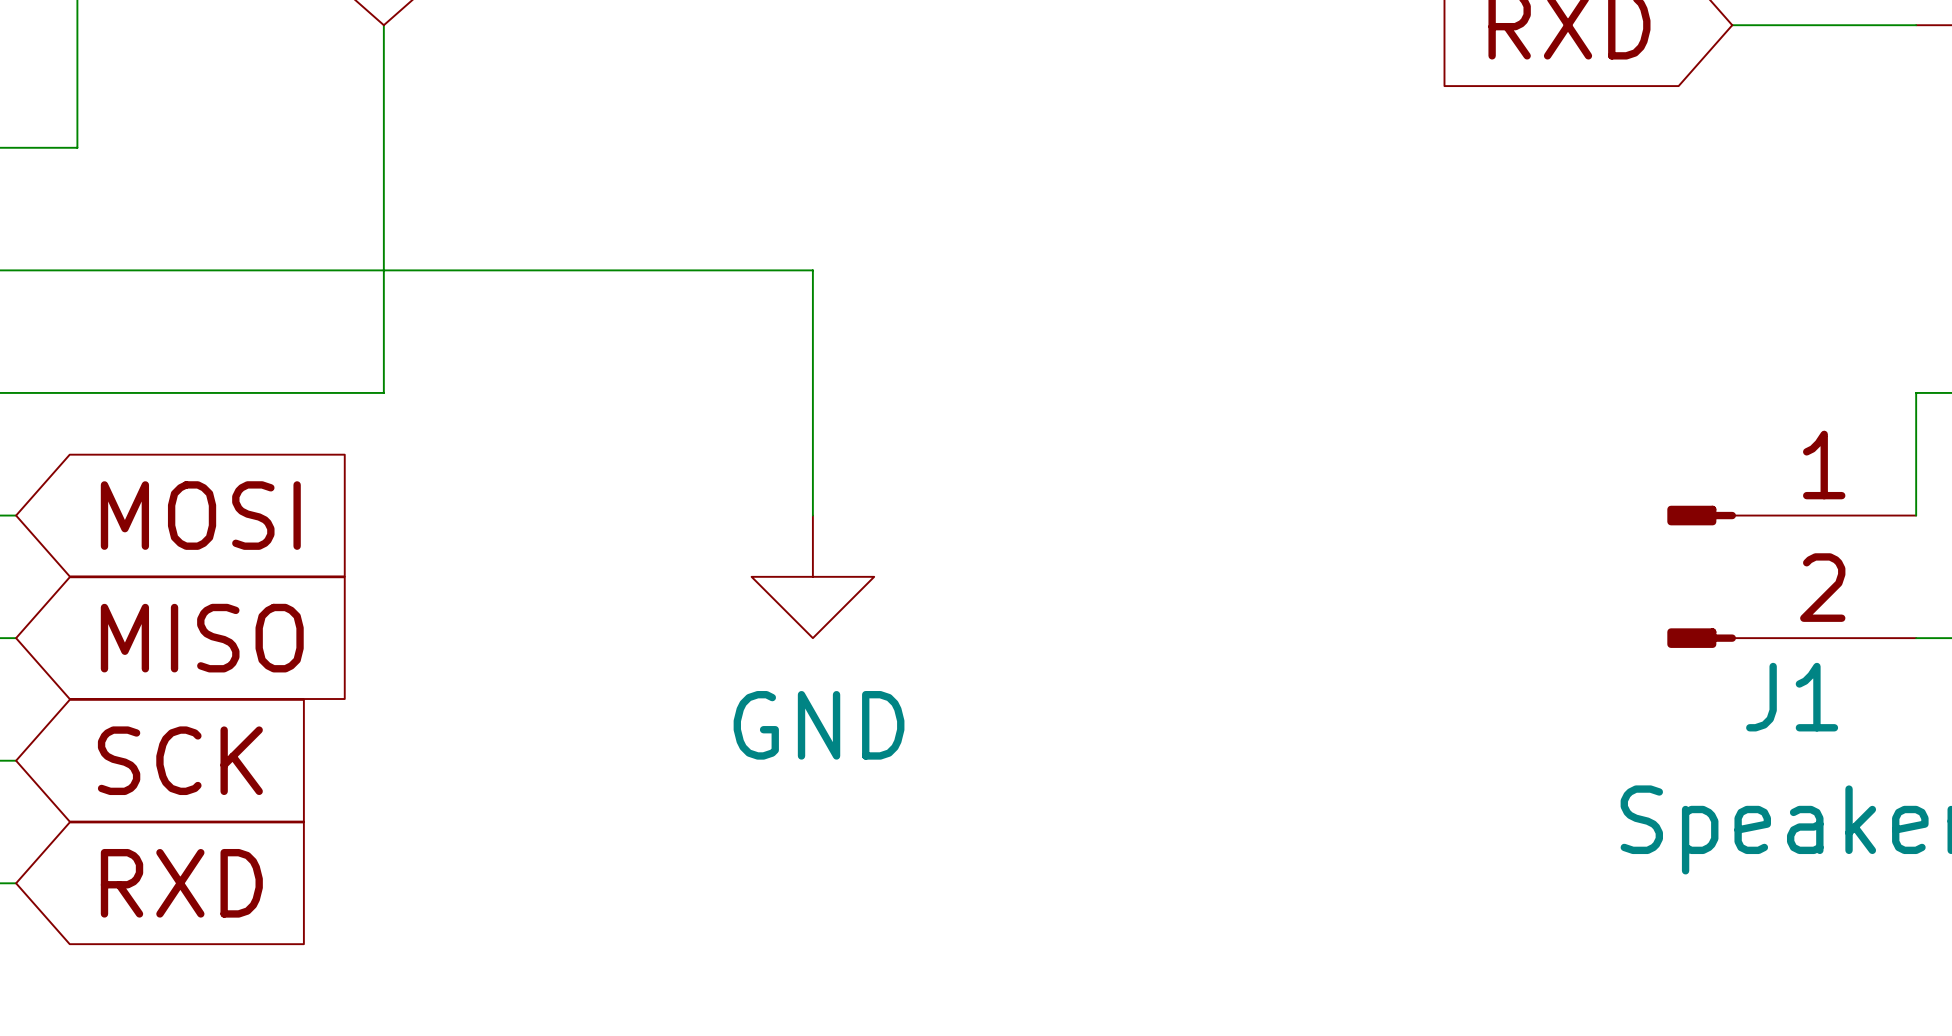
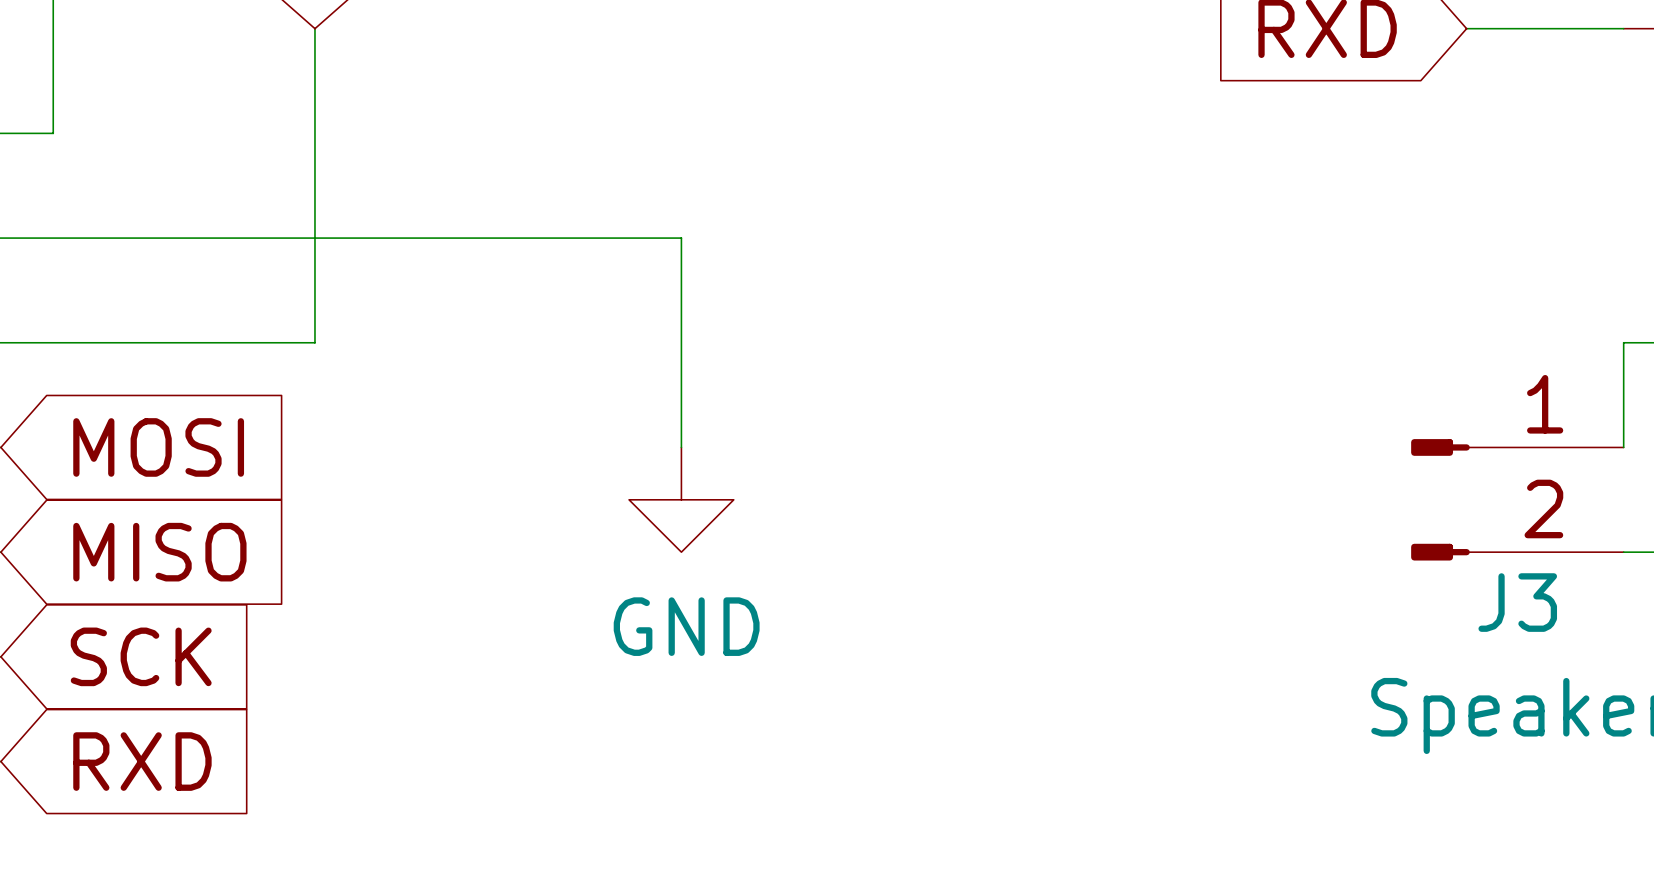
J1 name: J1 (1792, 697) -> J3 (1517, 602)

